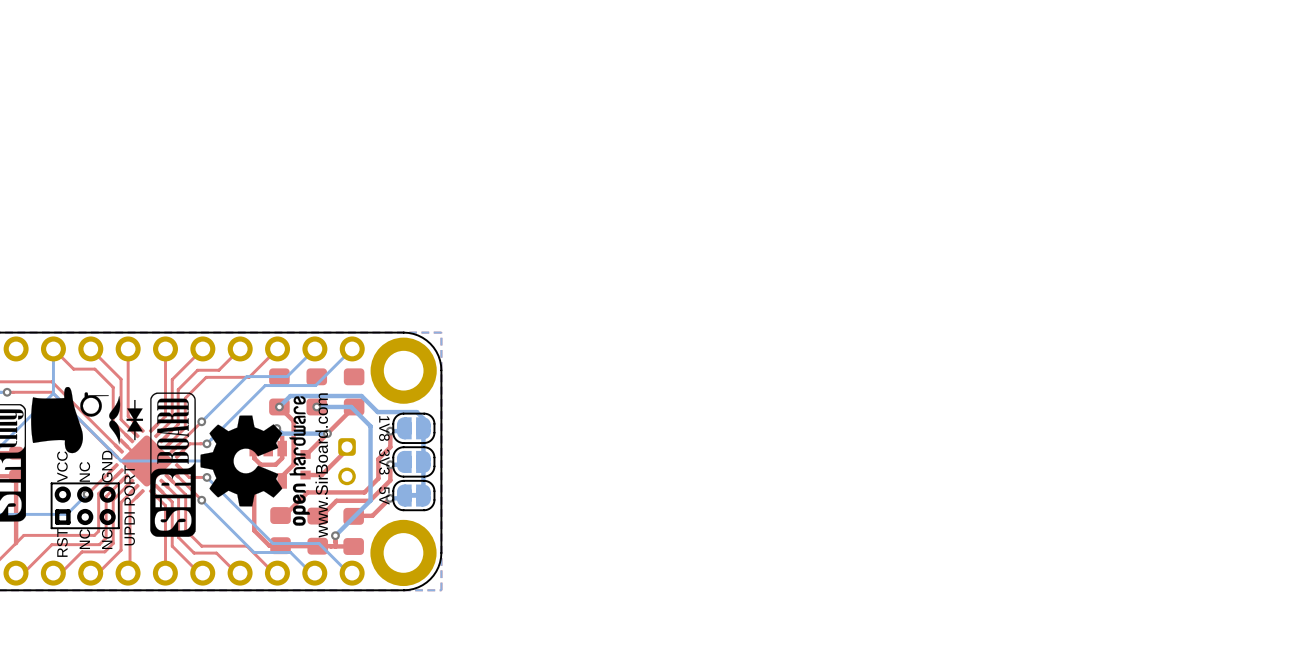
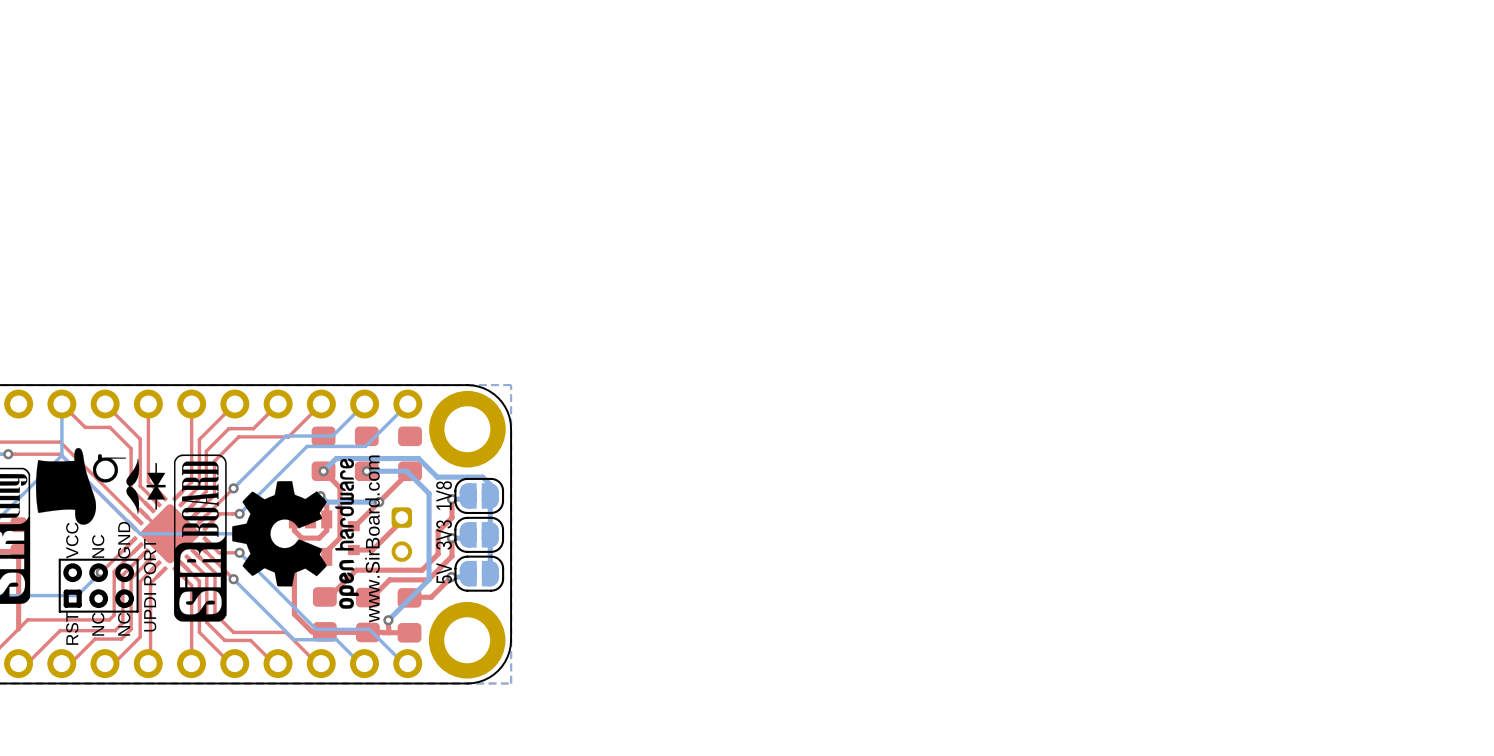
1V8 name rotation: 0° (384, 428) -> 180° (444, 495)
3V3 name rotation: 0° (384, 461) -> 180° (444, 534)
5V footprint: [392, 479, 436, 512] -> [454, 555, 505, 592]

